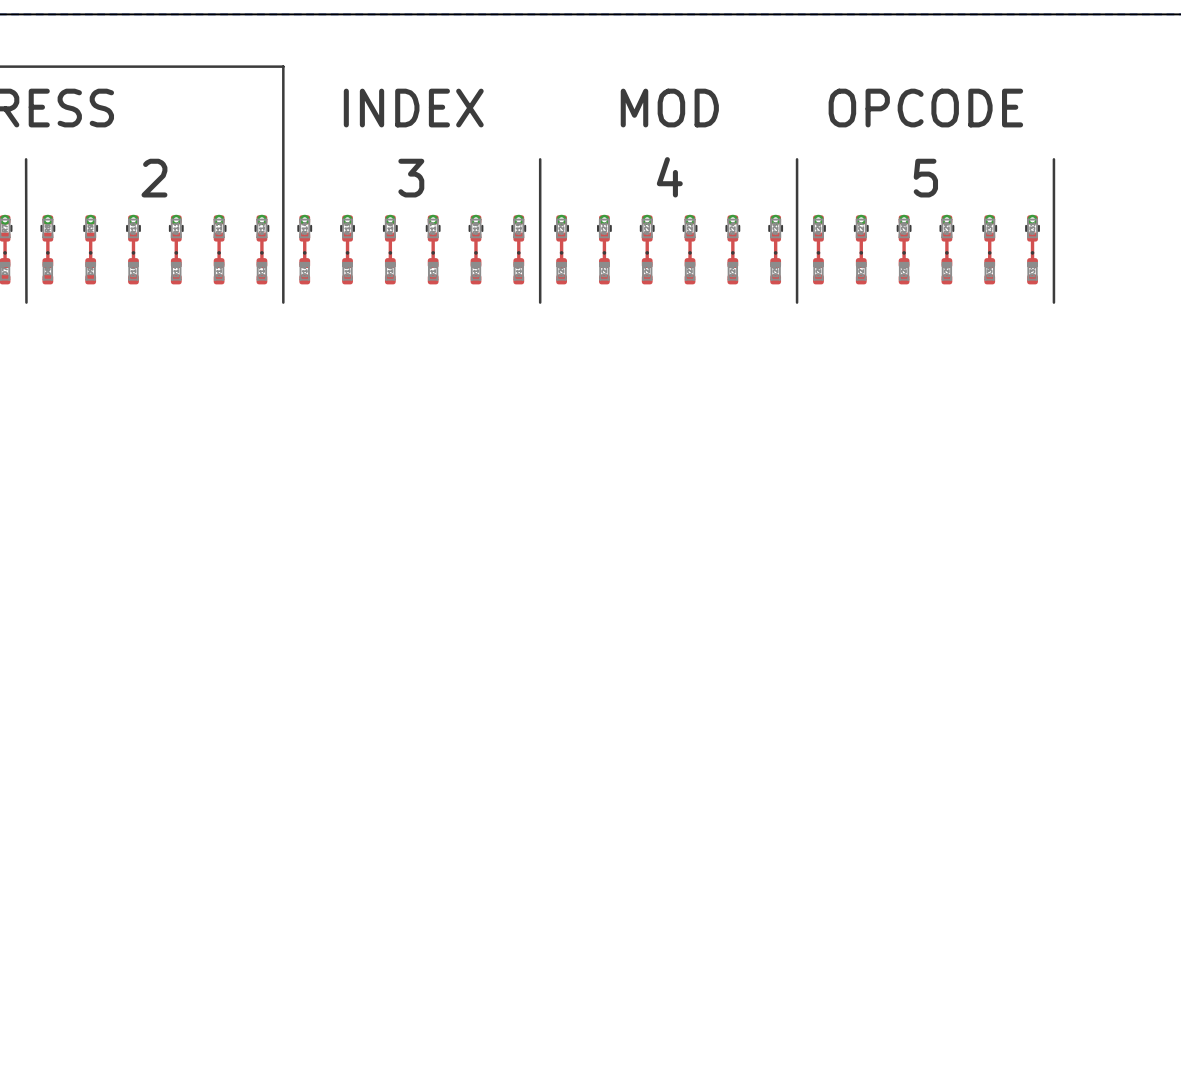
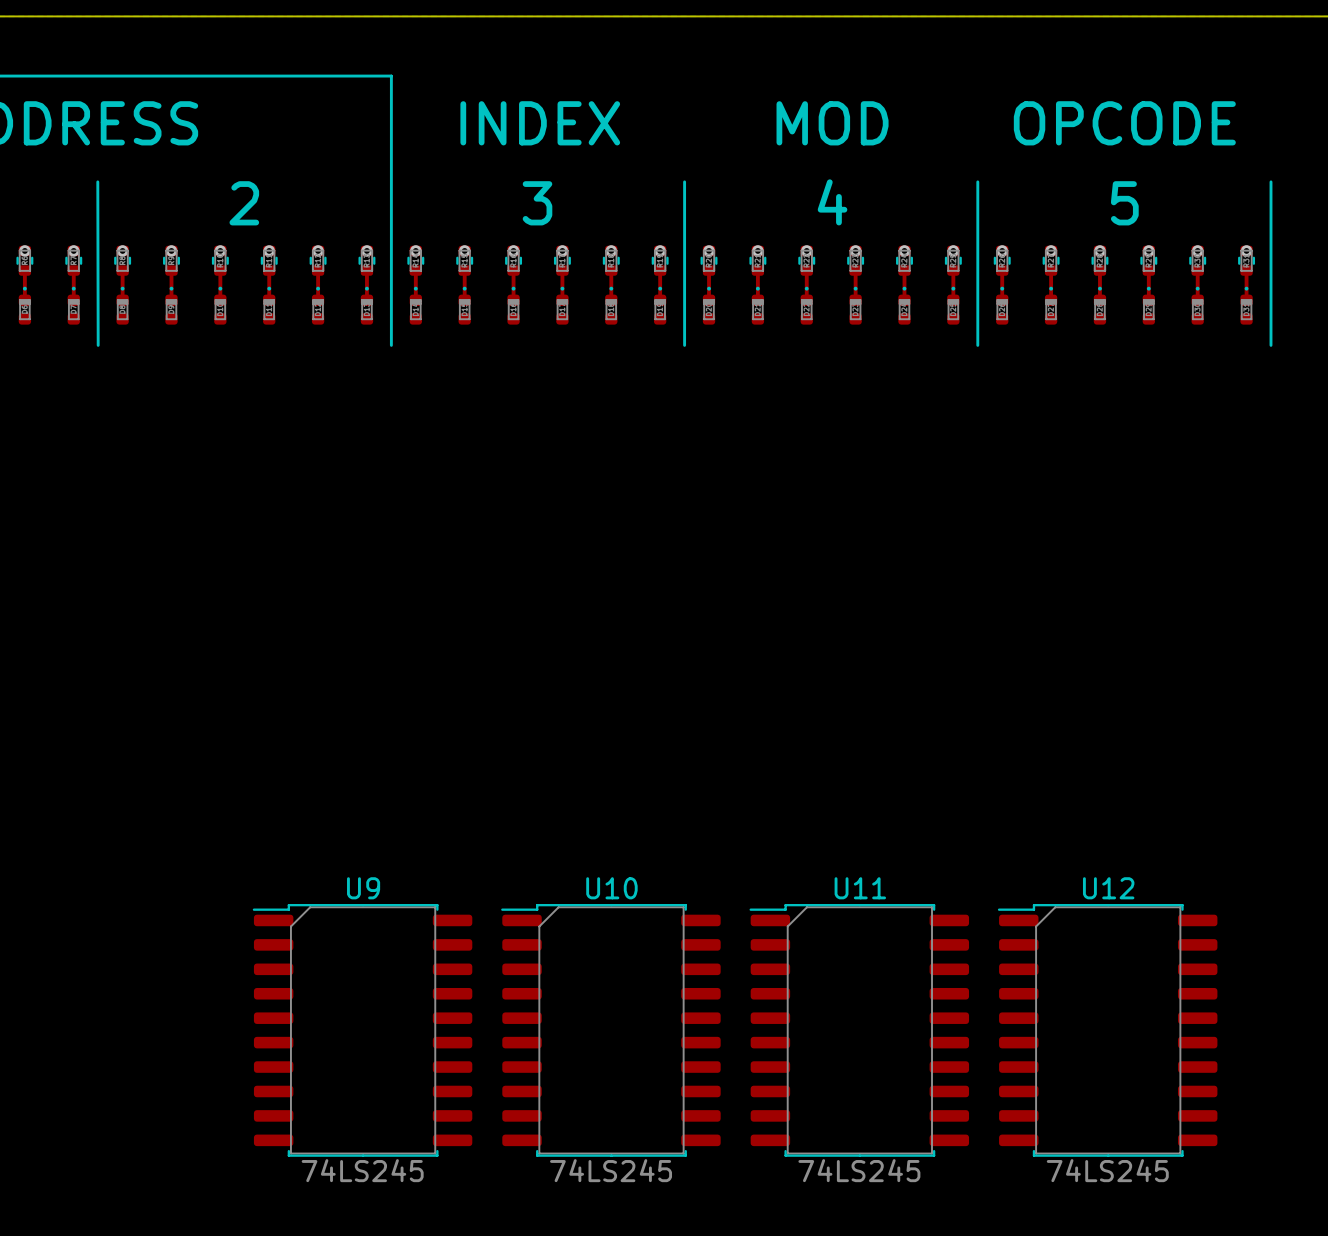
U9: none -> 74LS245 (362, 1030)
U10: none -> 74LS245 (610, 1030)
U11: none -> 74LS245 (859, 1030)
U12: none -> 74LS245 (1107, 1030)

